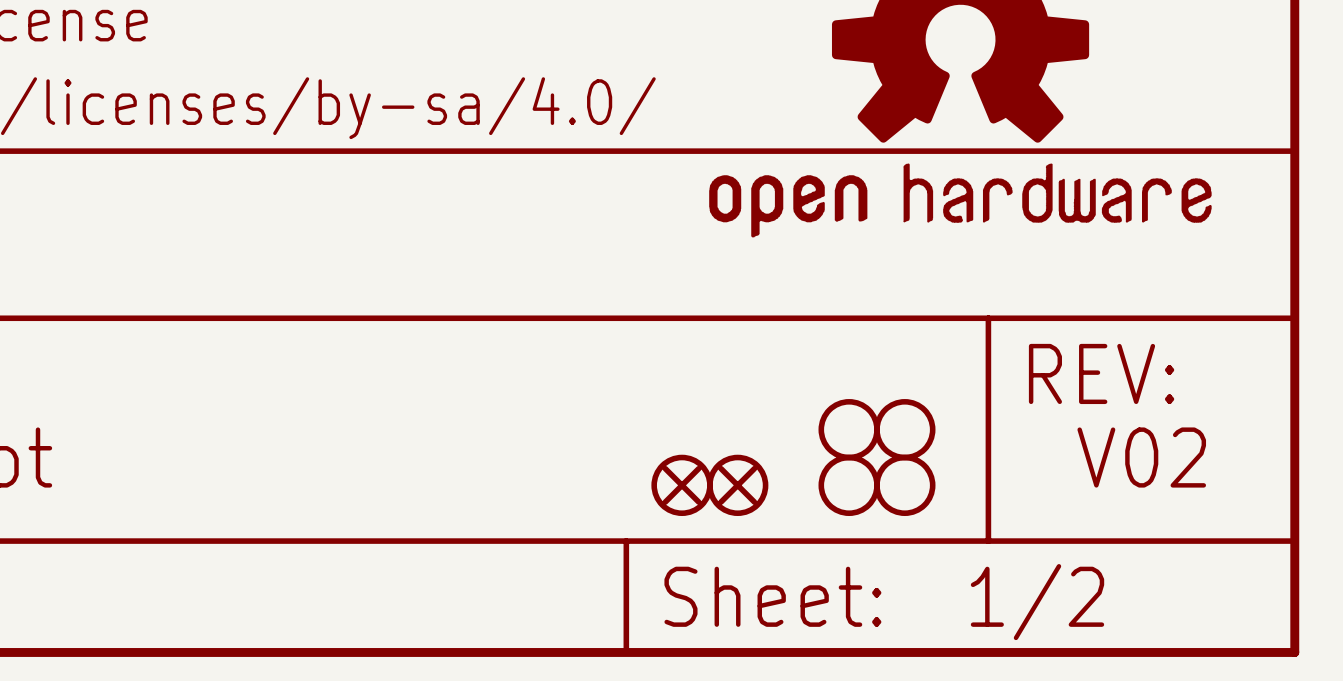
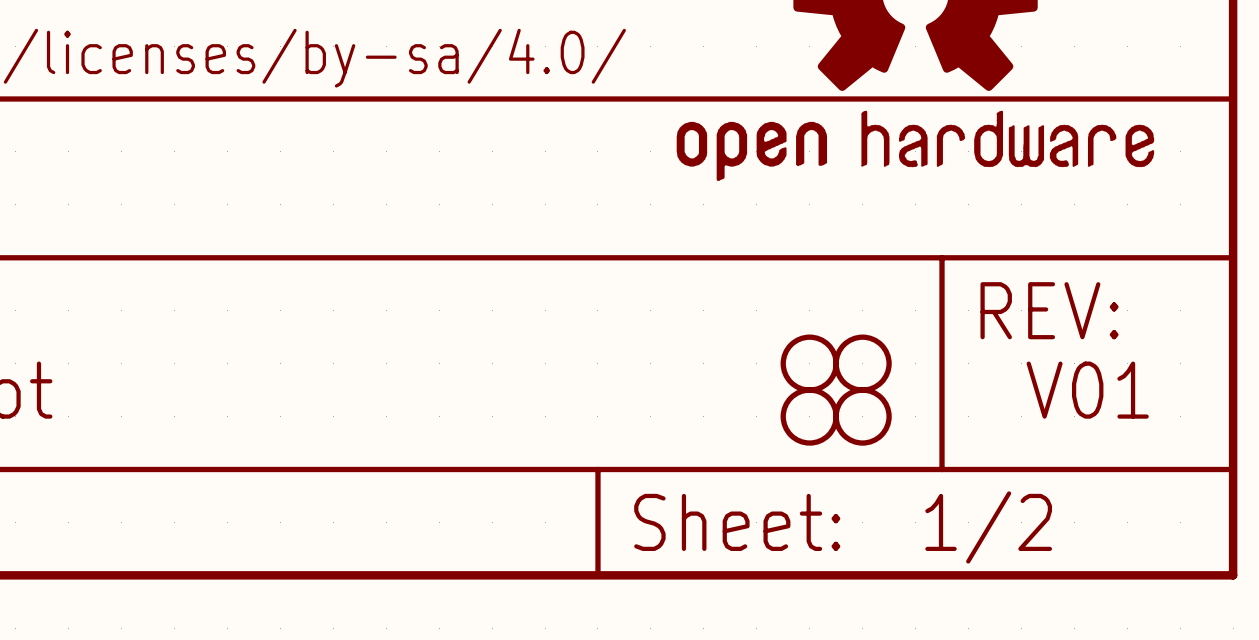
text: V02 (1141, 457) -> V01 (1087, 390)
part: (682, 485) -> none
part: (737, 485) -> none

